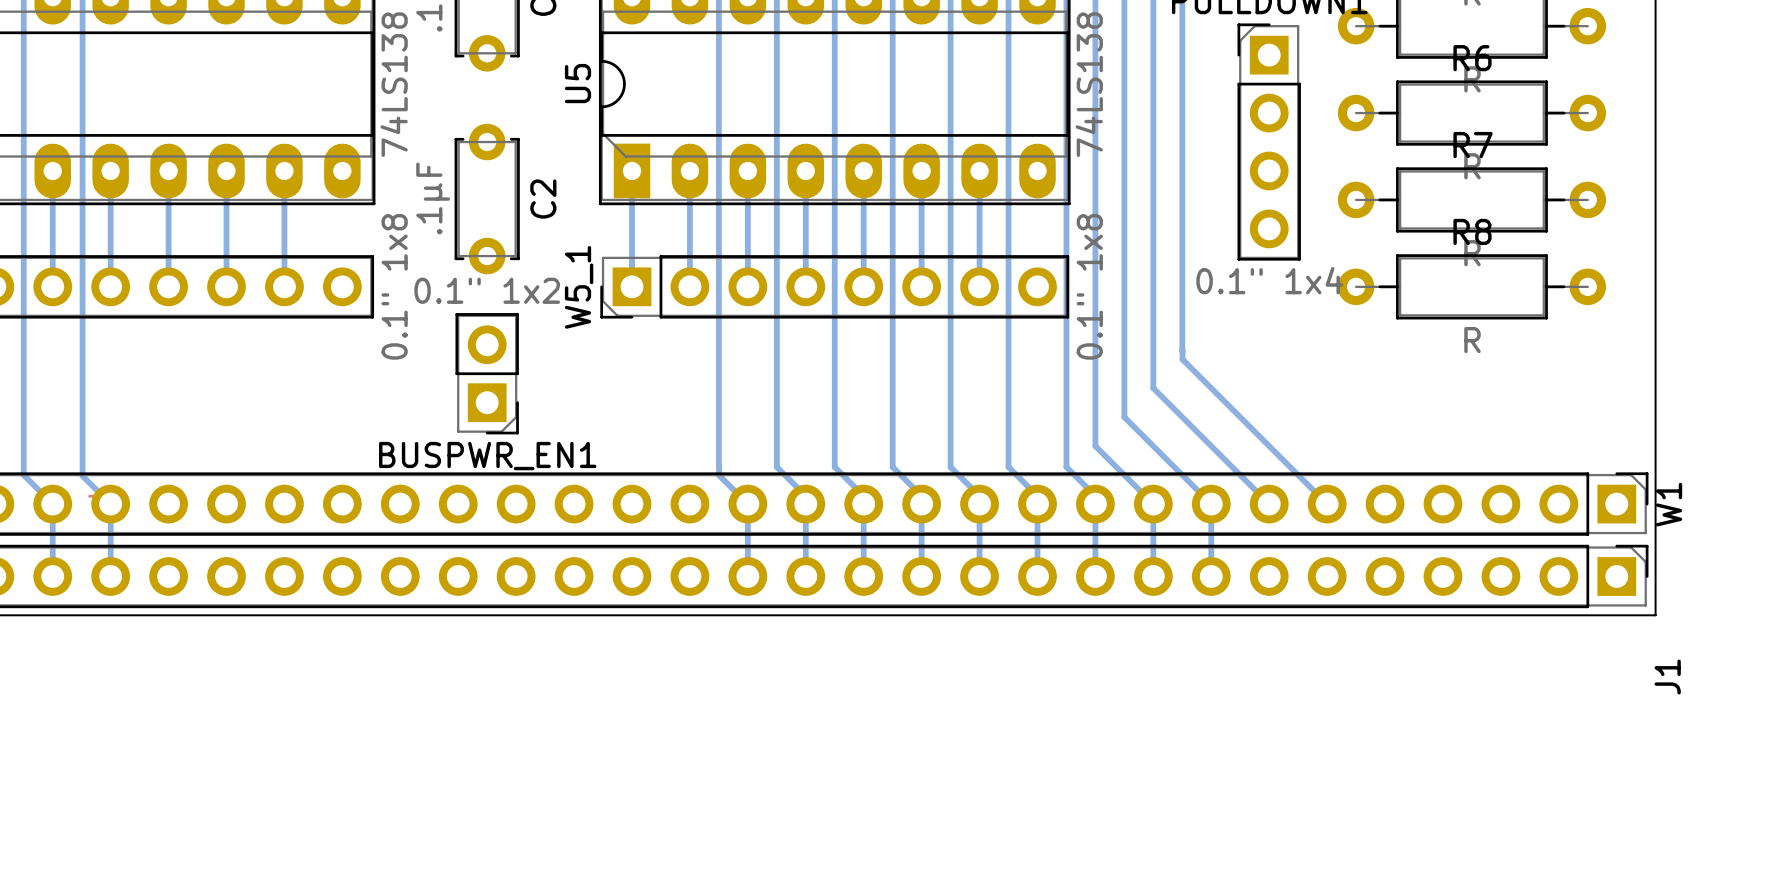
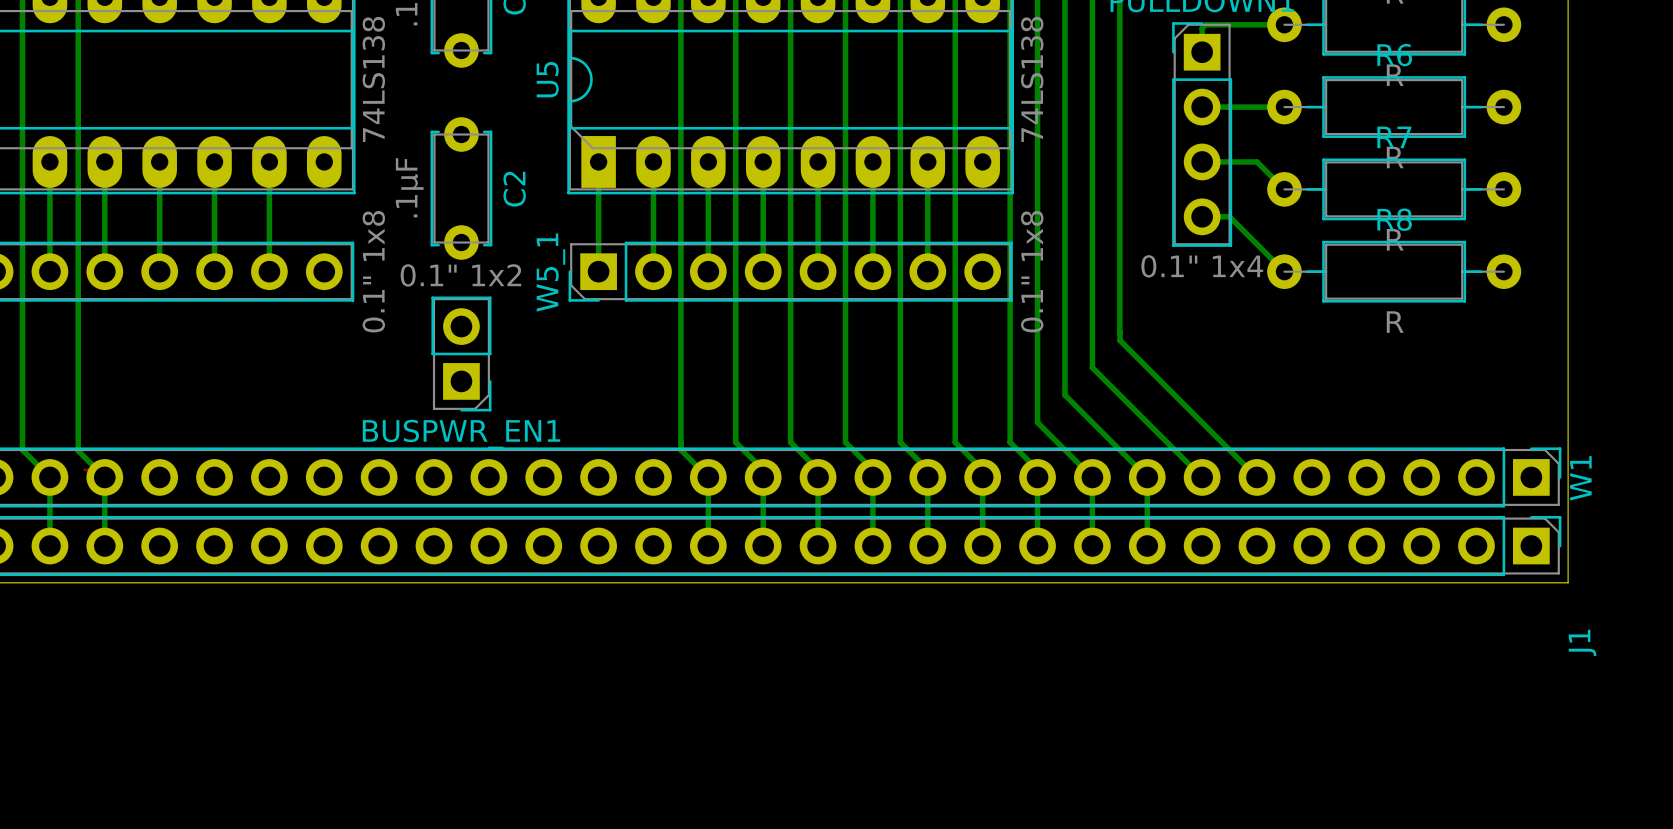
bottom track: none -> (1284, 24) (1205, 24) (1202, 28) (1202, 52)
bottom track: none -> (1202, 107) (1284, 107)
bottom track: none -> (1202, 161) (1257, 161) (1284, 189)
bottom track: none -> (1202, 216) (1229, 216) (1284, 271)

